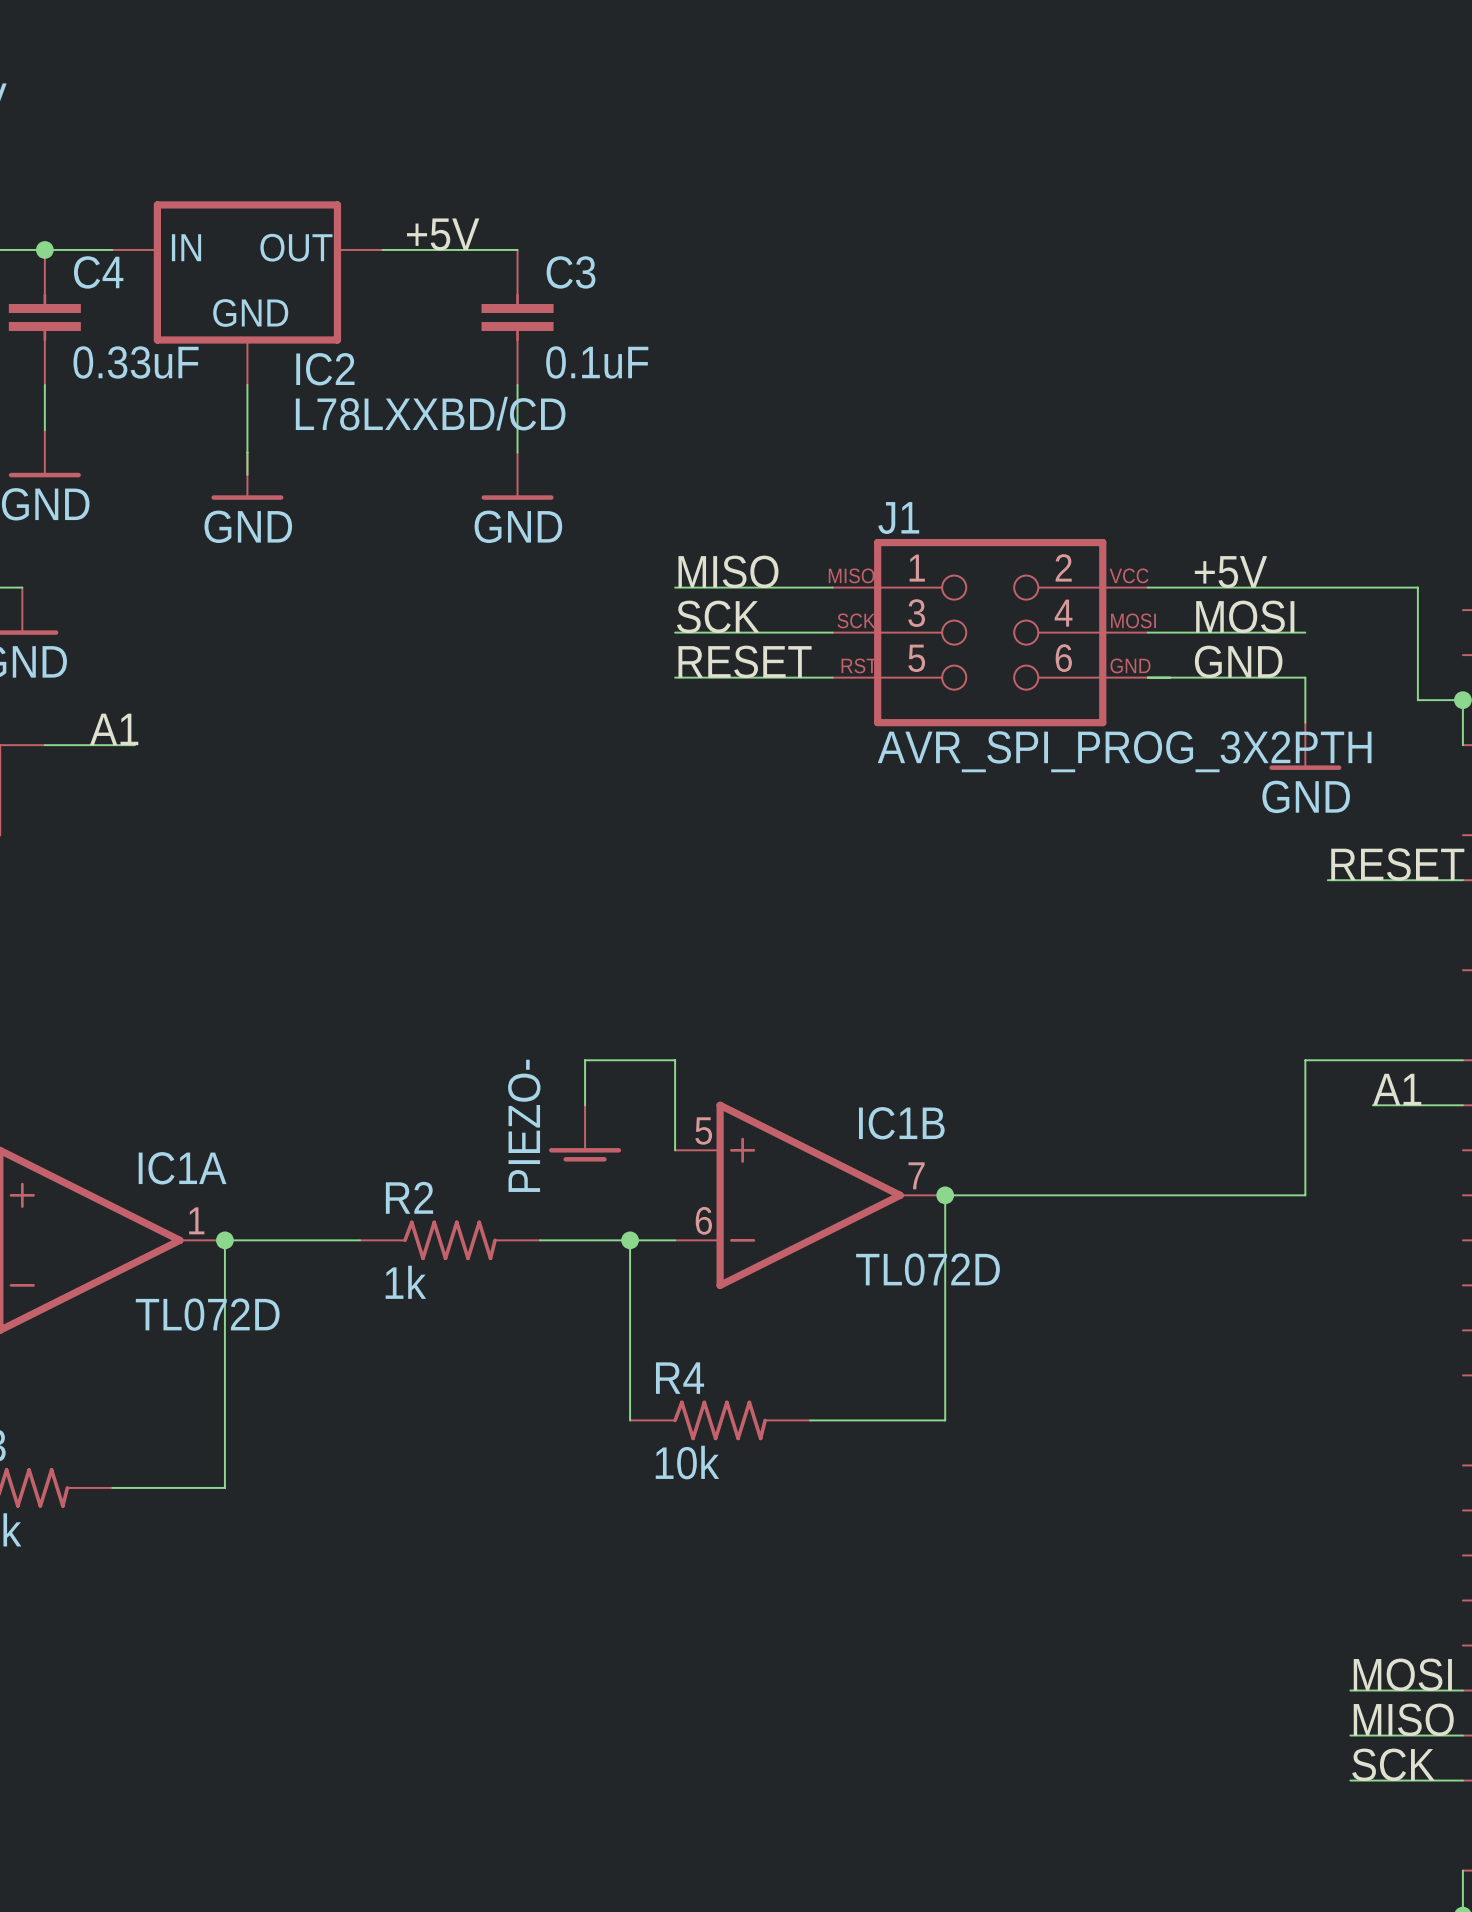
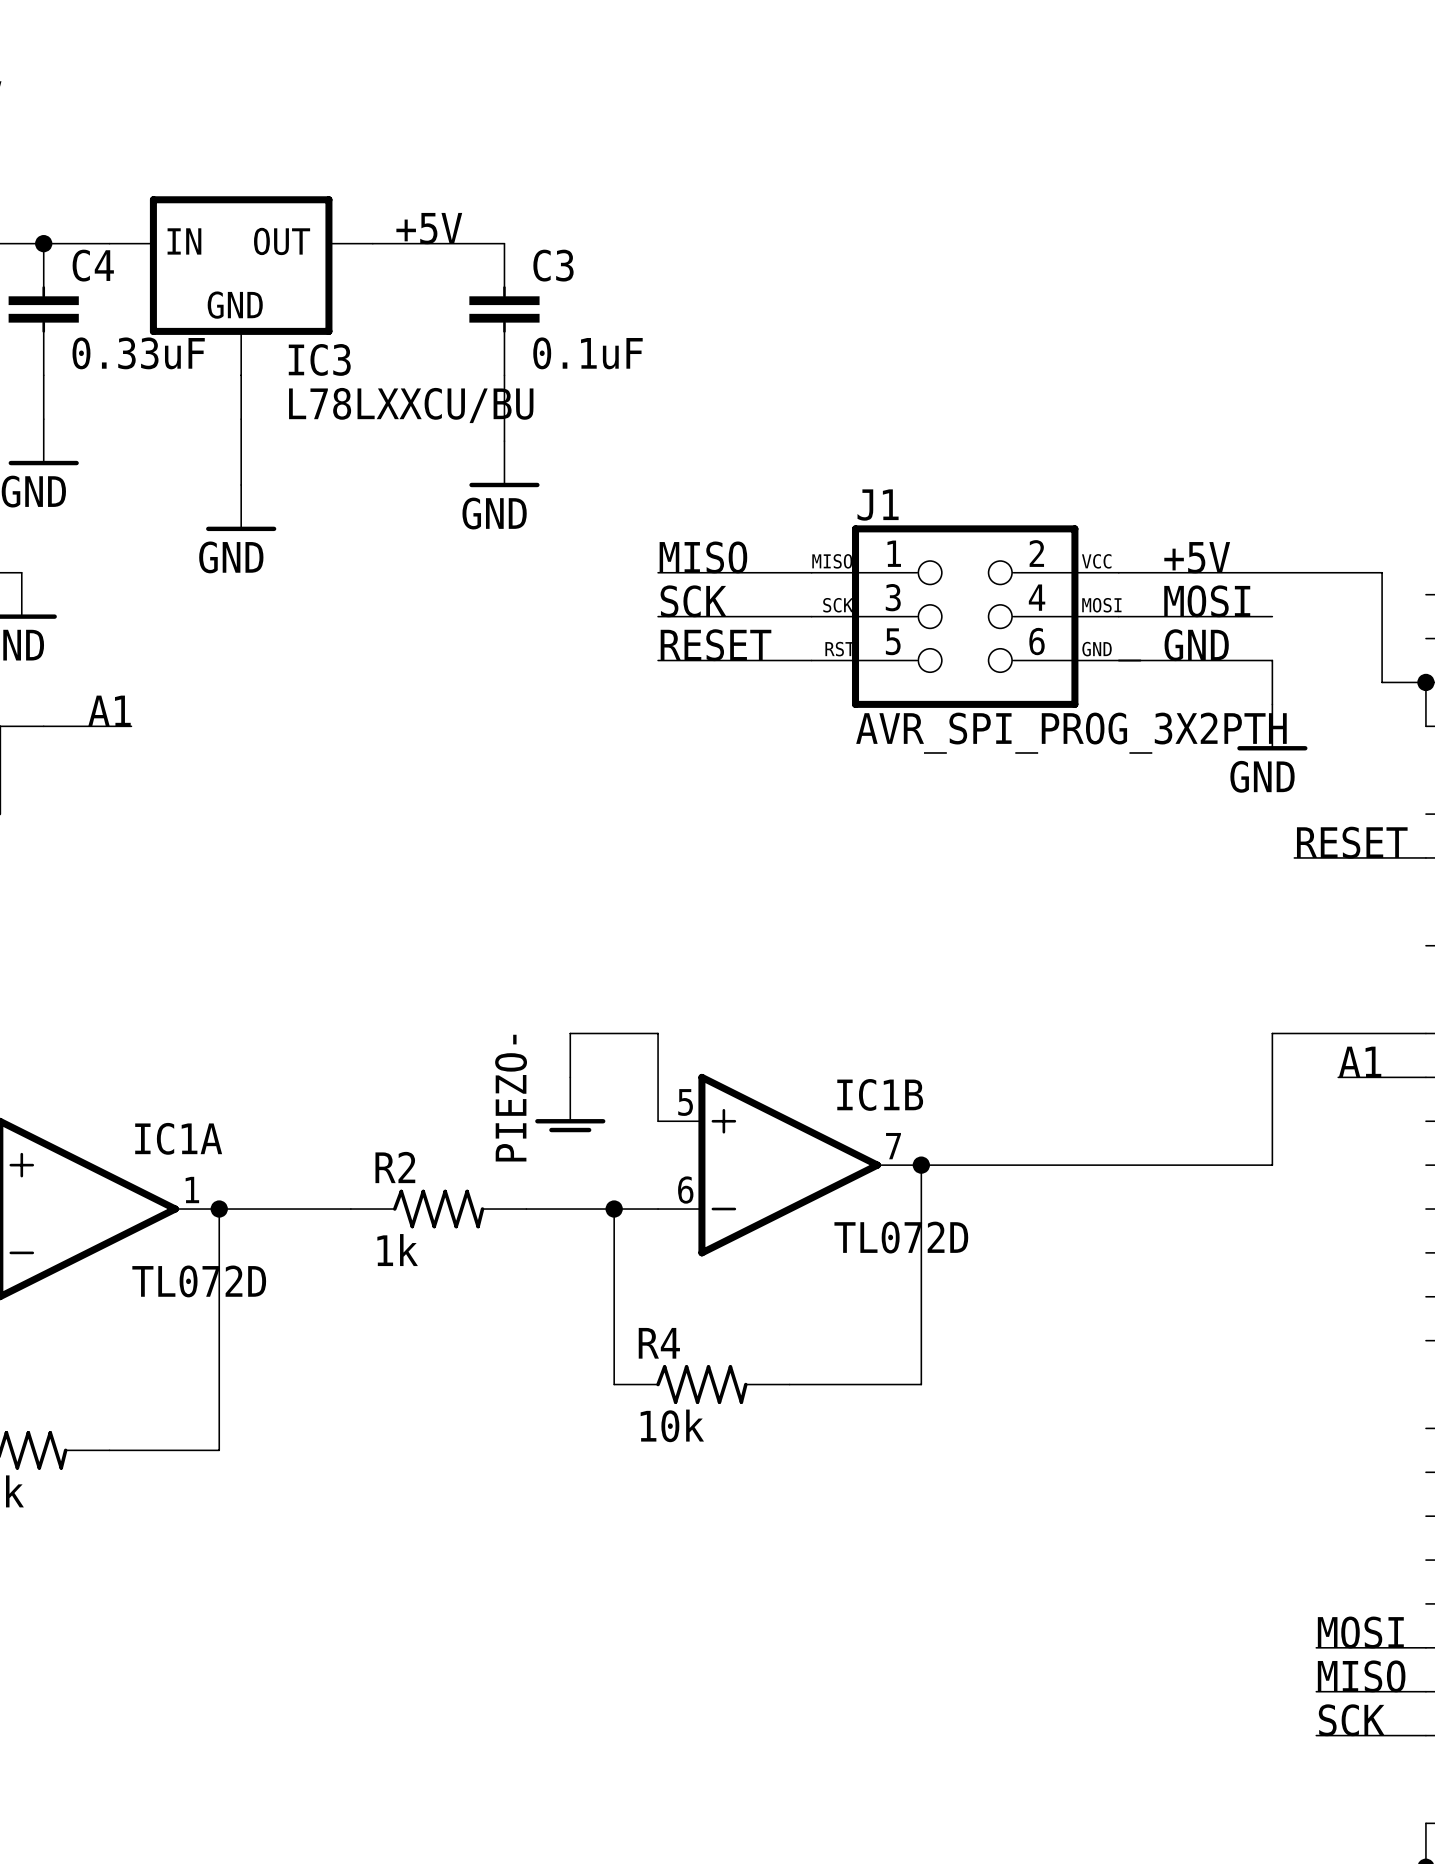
IC2: L78LXXBD/CD (247, 293) -> none
IC3: none -> L78LXXCU/BU (241, 307)
power symbol position: GND (247, 476) -> GND (241, 508)

